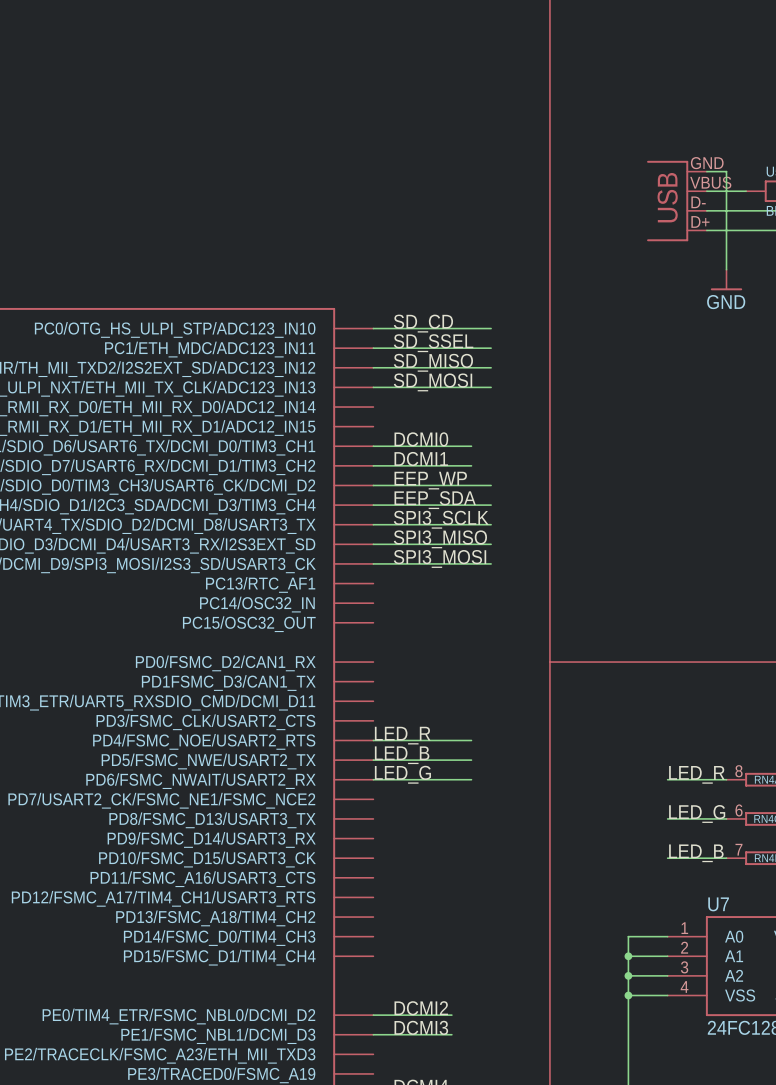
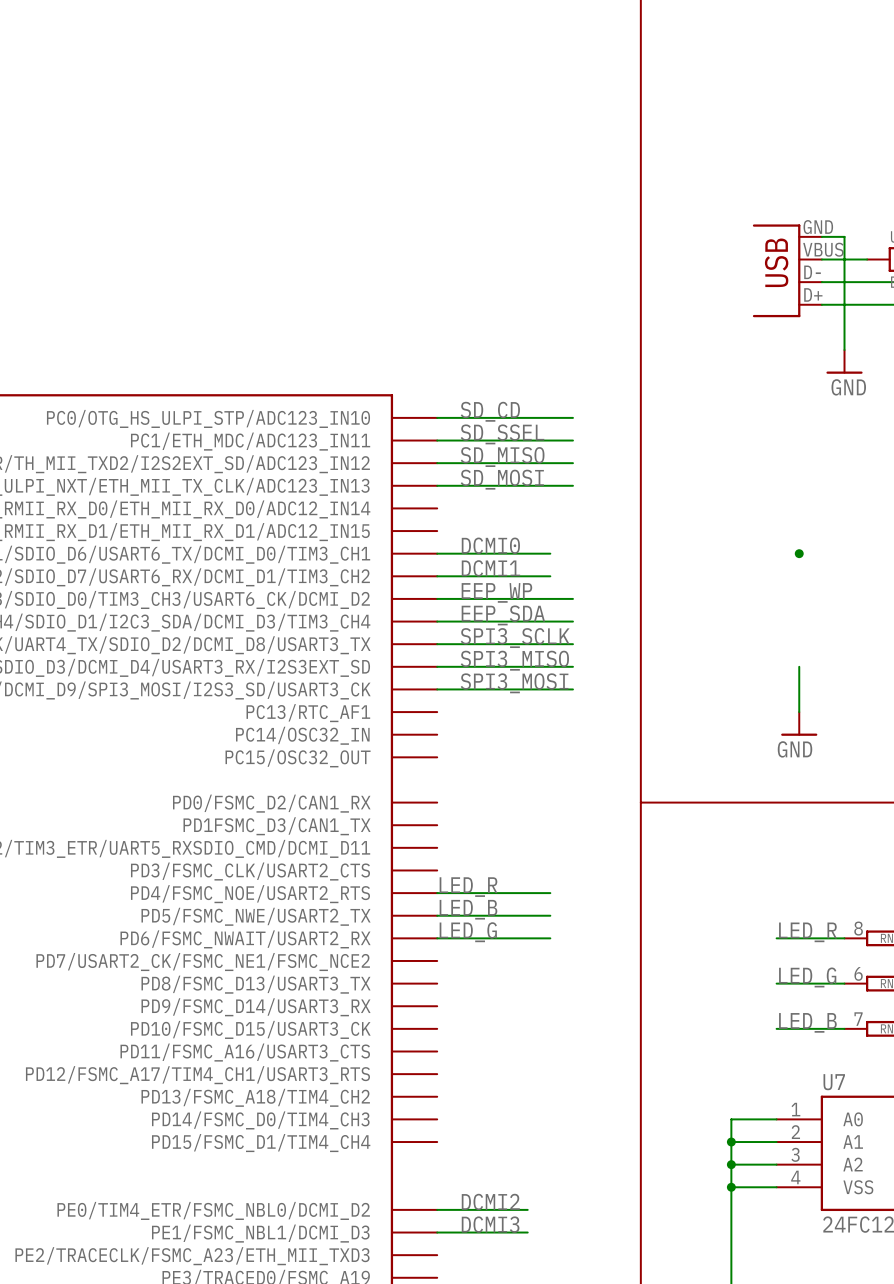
junction: none -> (799, 553)
wire: none -> (799, 666) (799, 712)
power symbol: none -> GND (799, 723)

